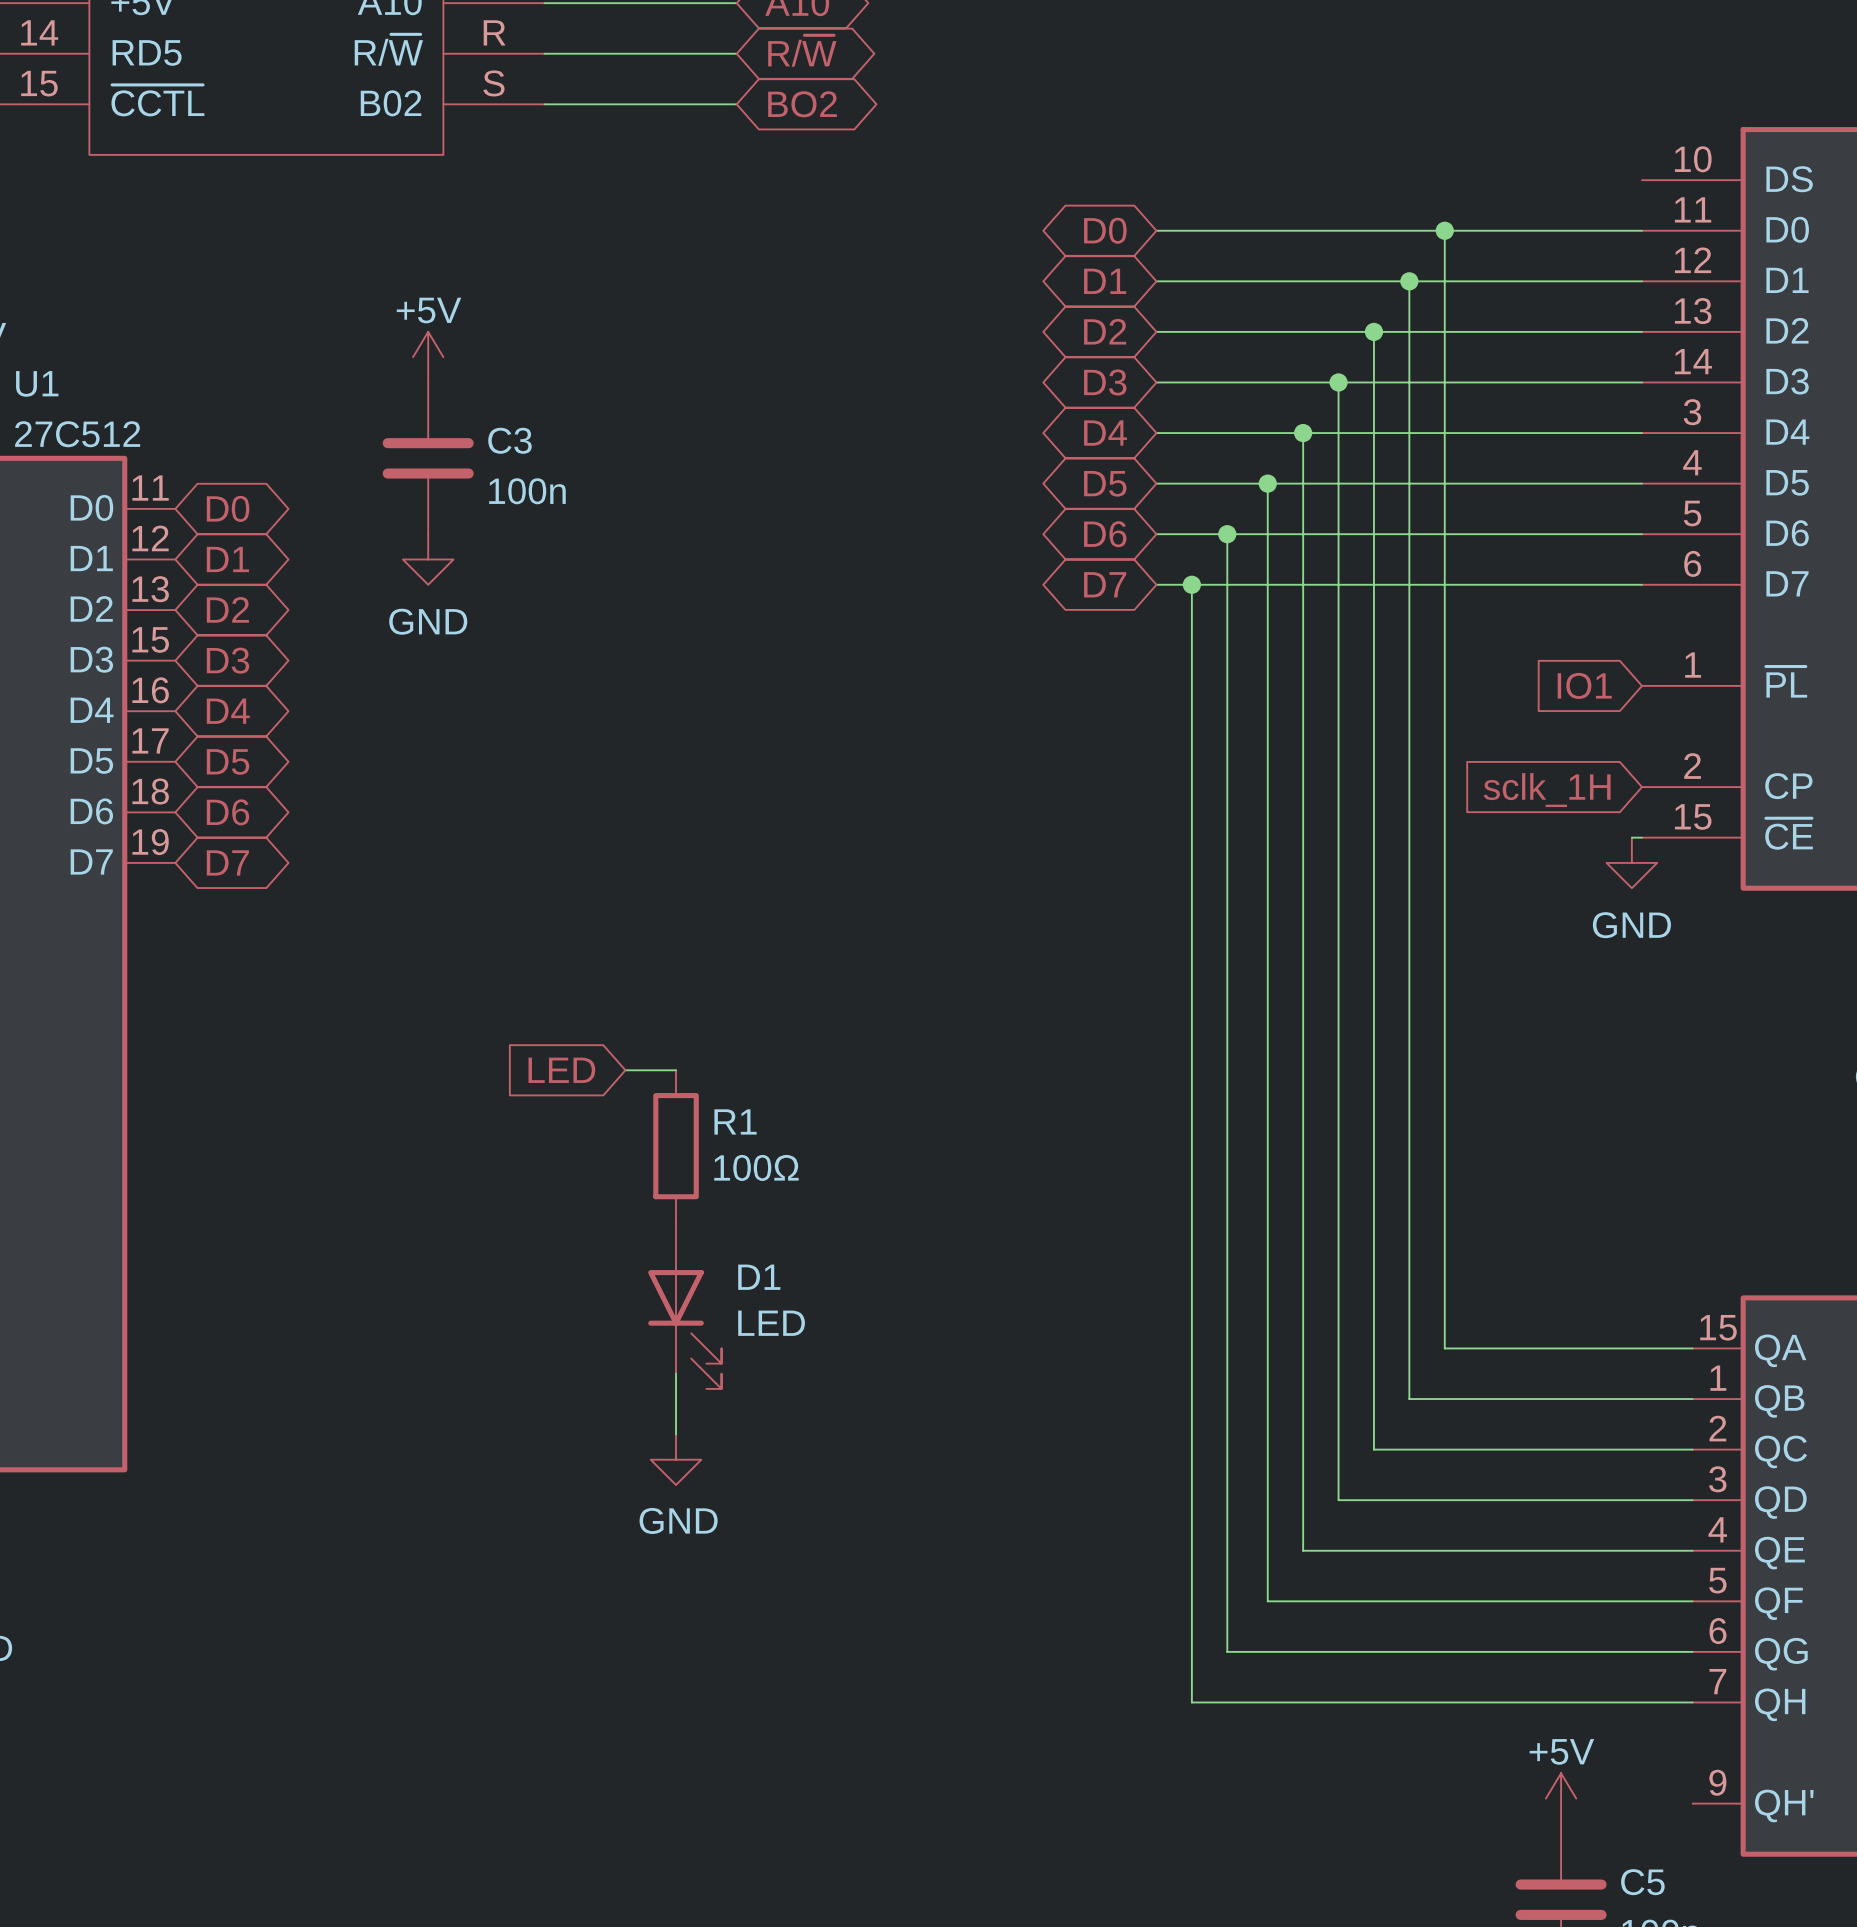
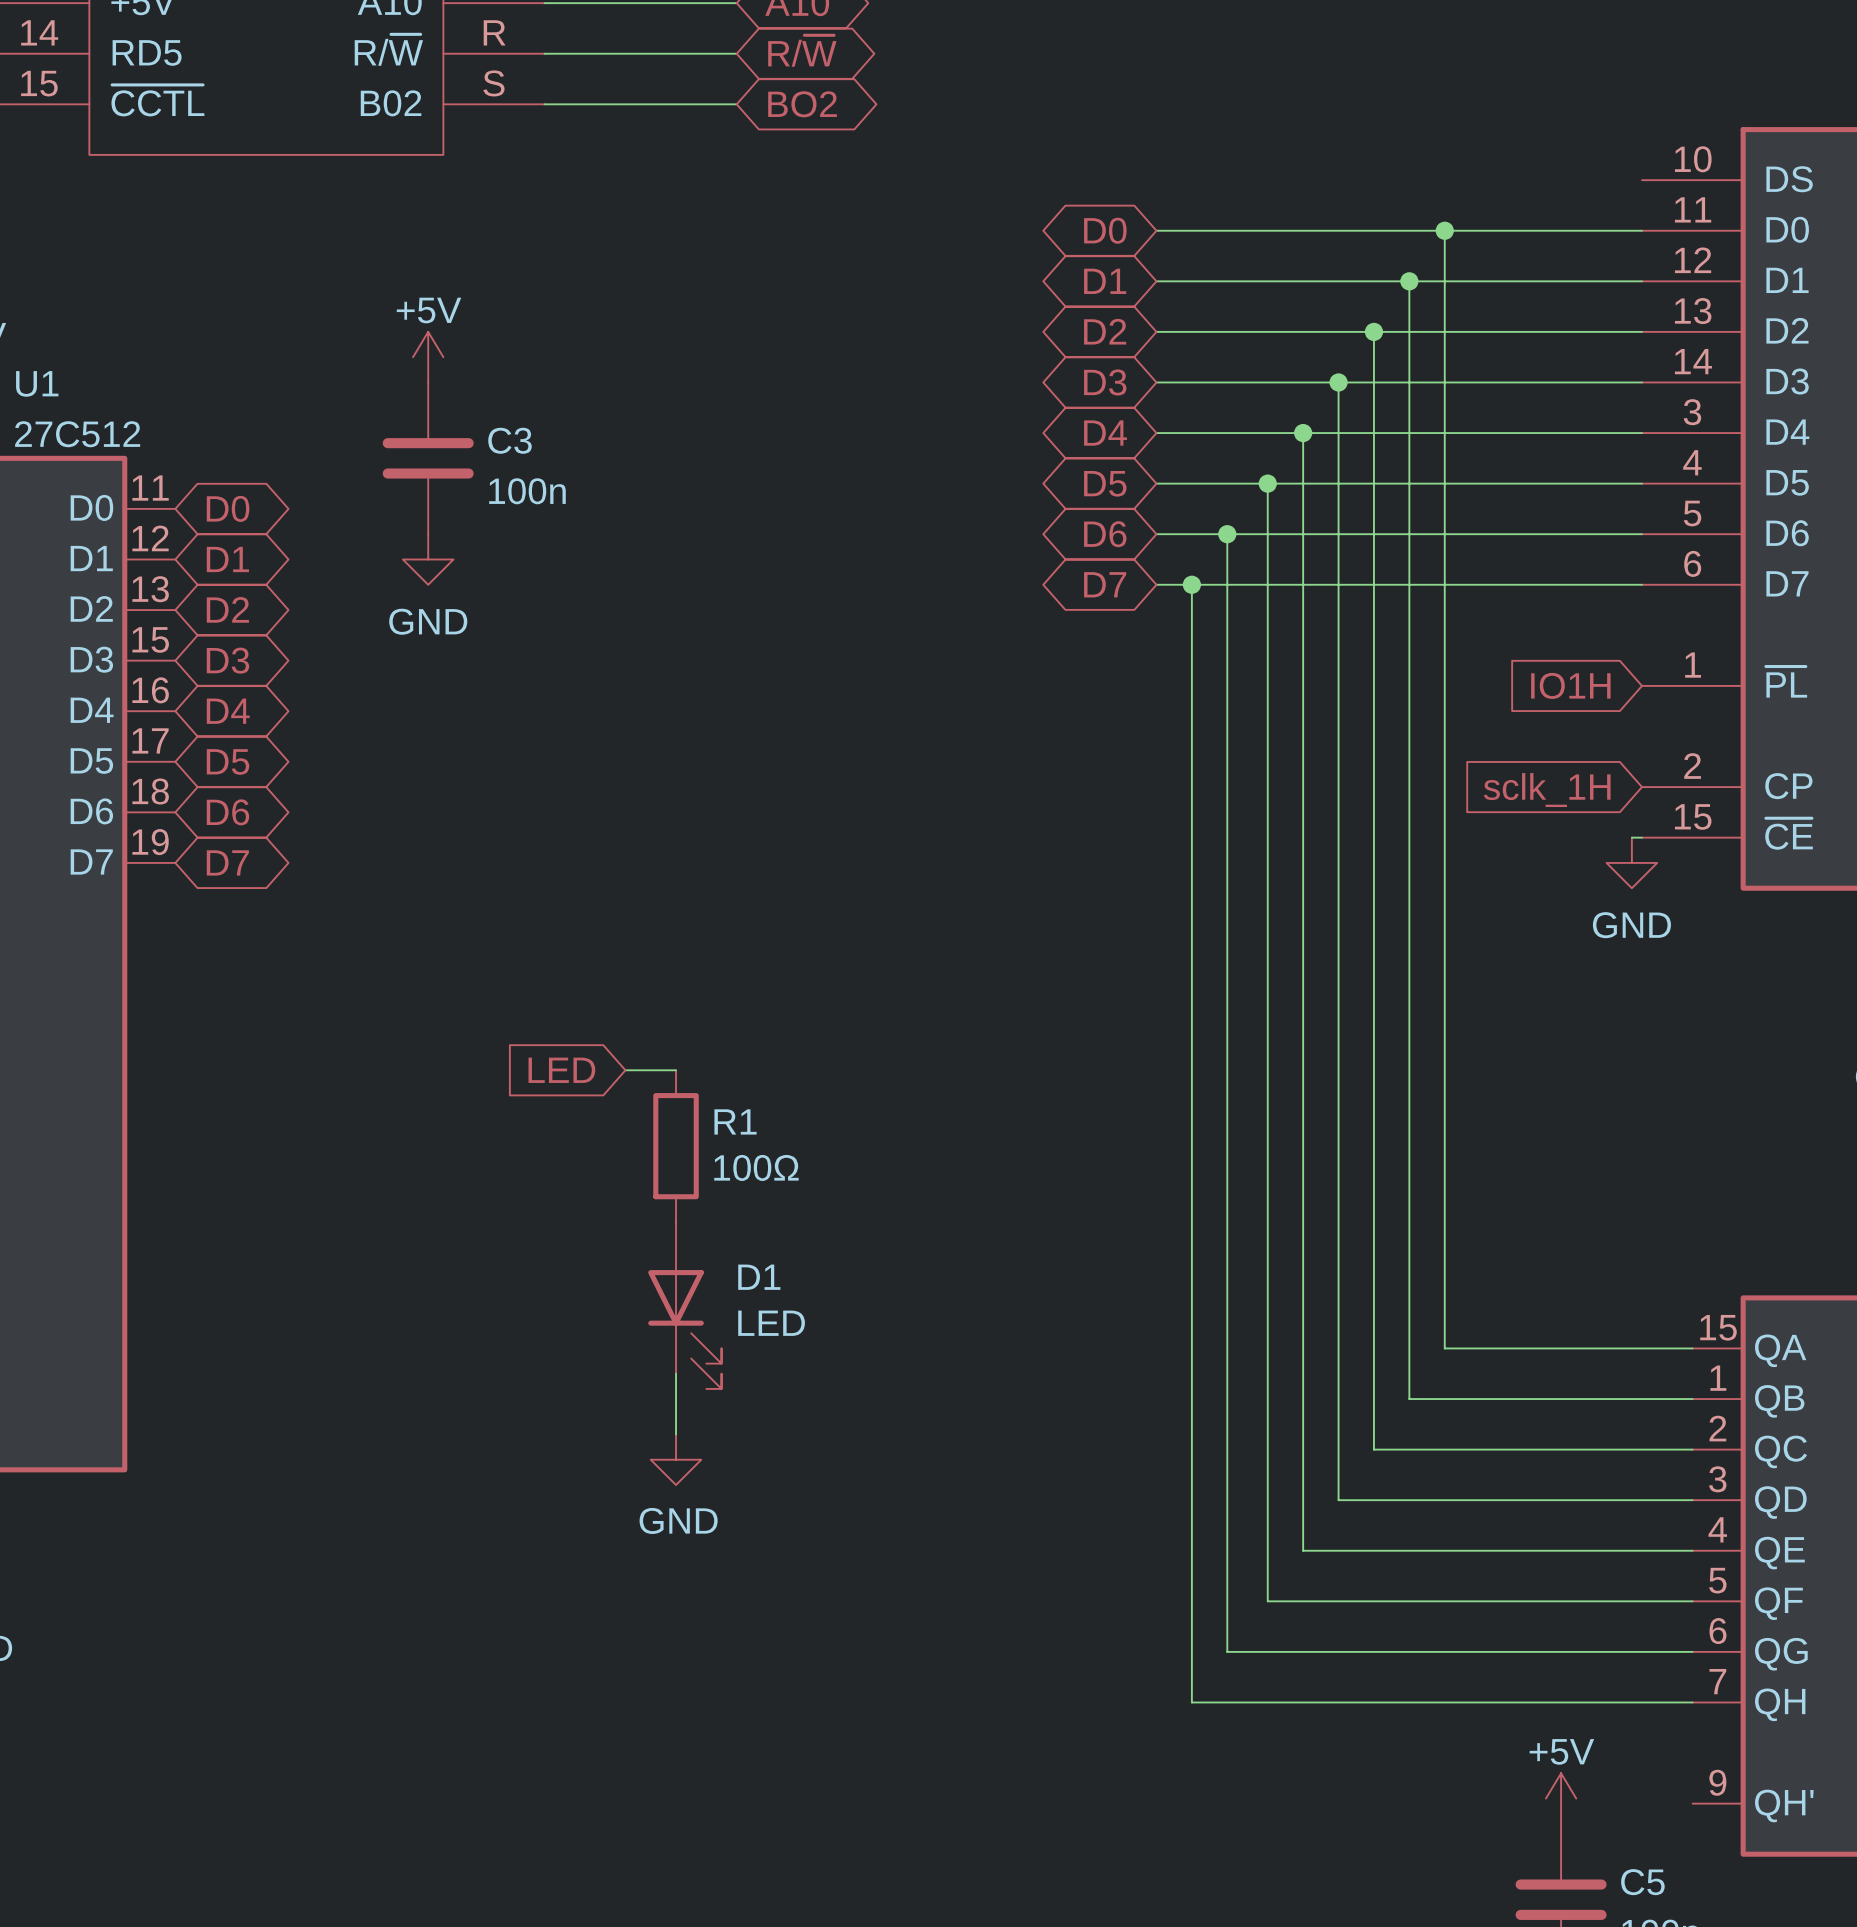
global label: IO1 (1584, 685) -> IO1H (1570, 685)

